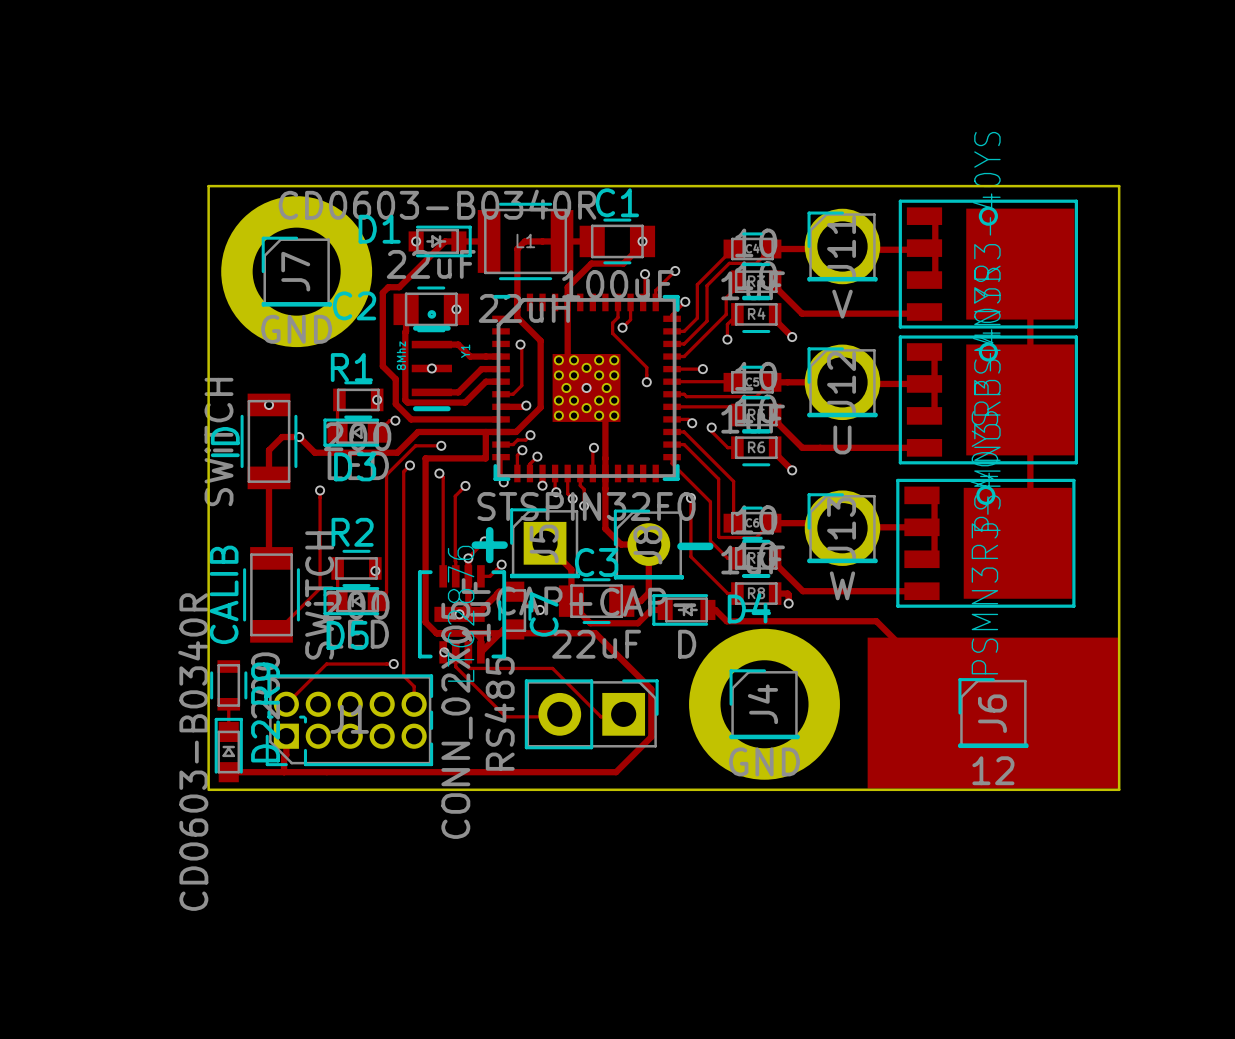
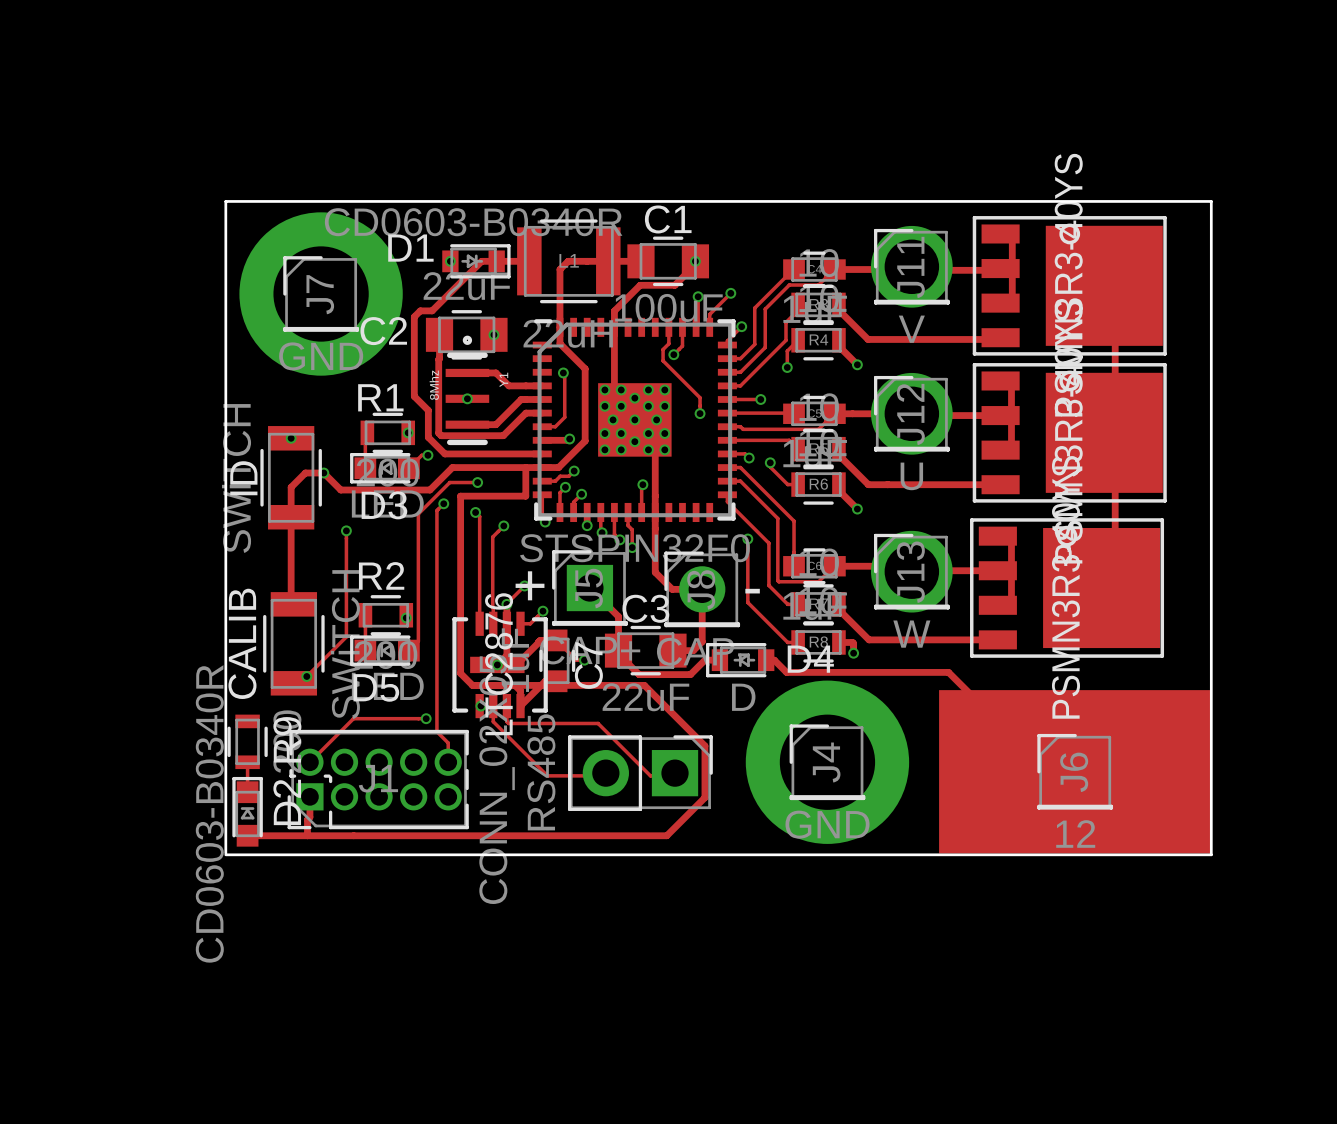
via: none -> (306, 676)

